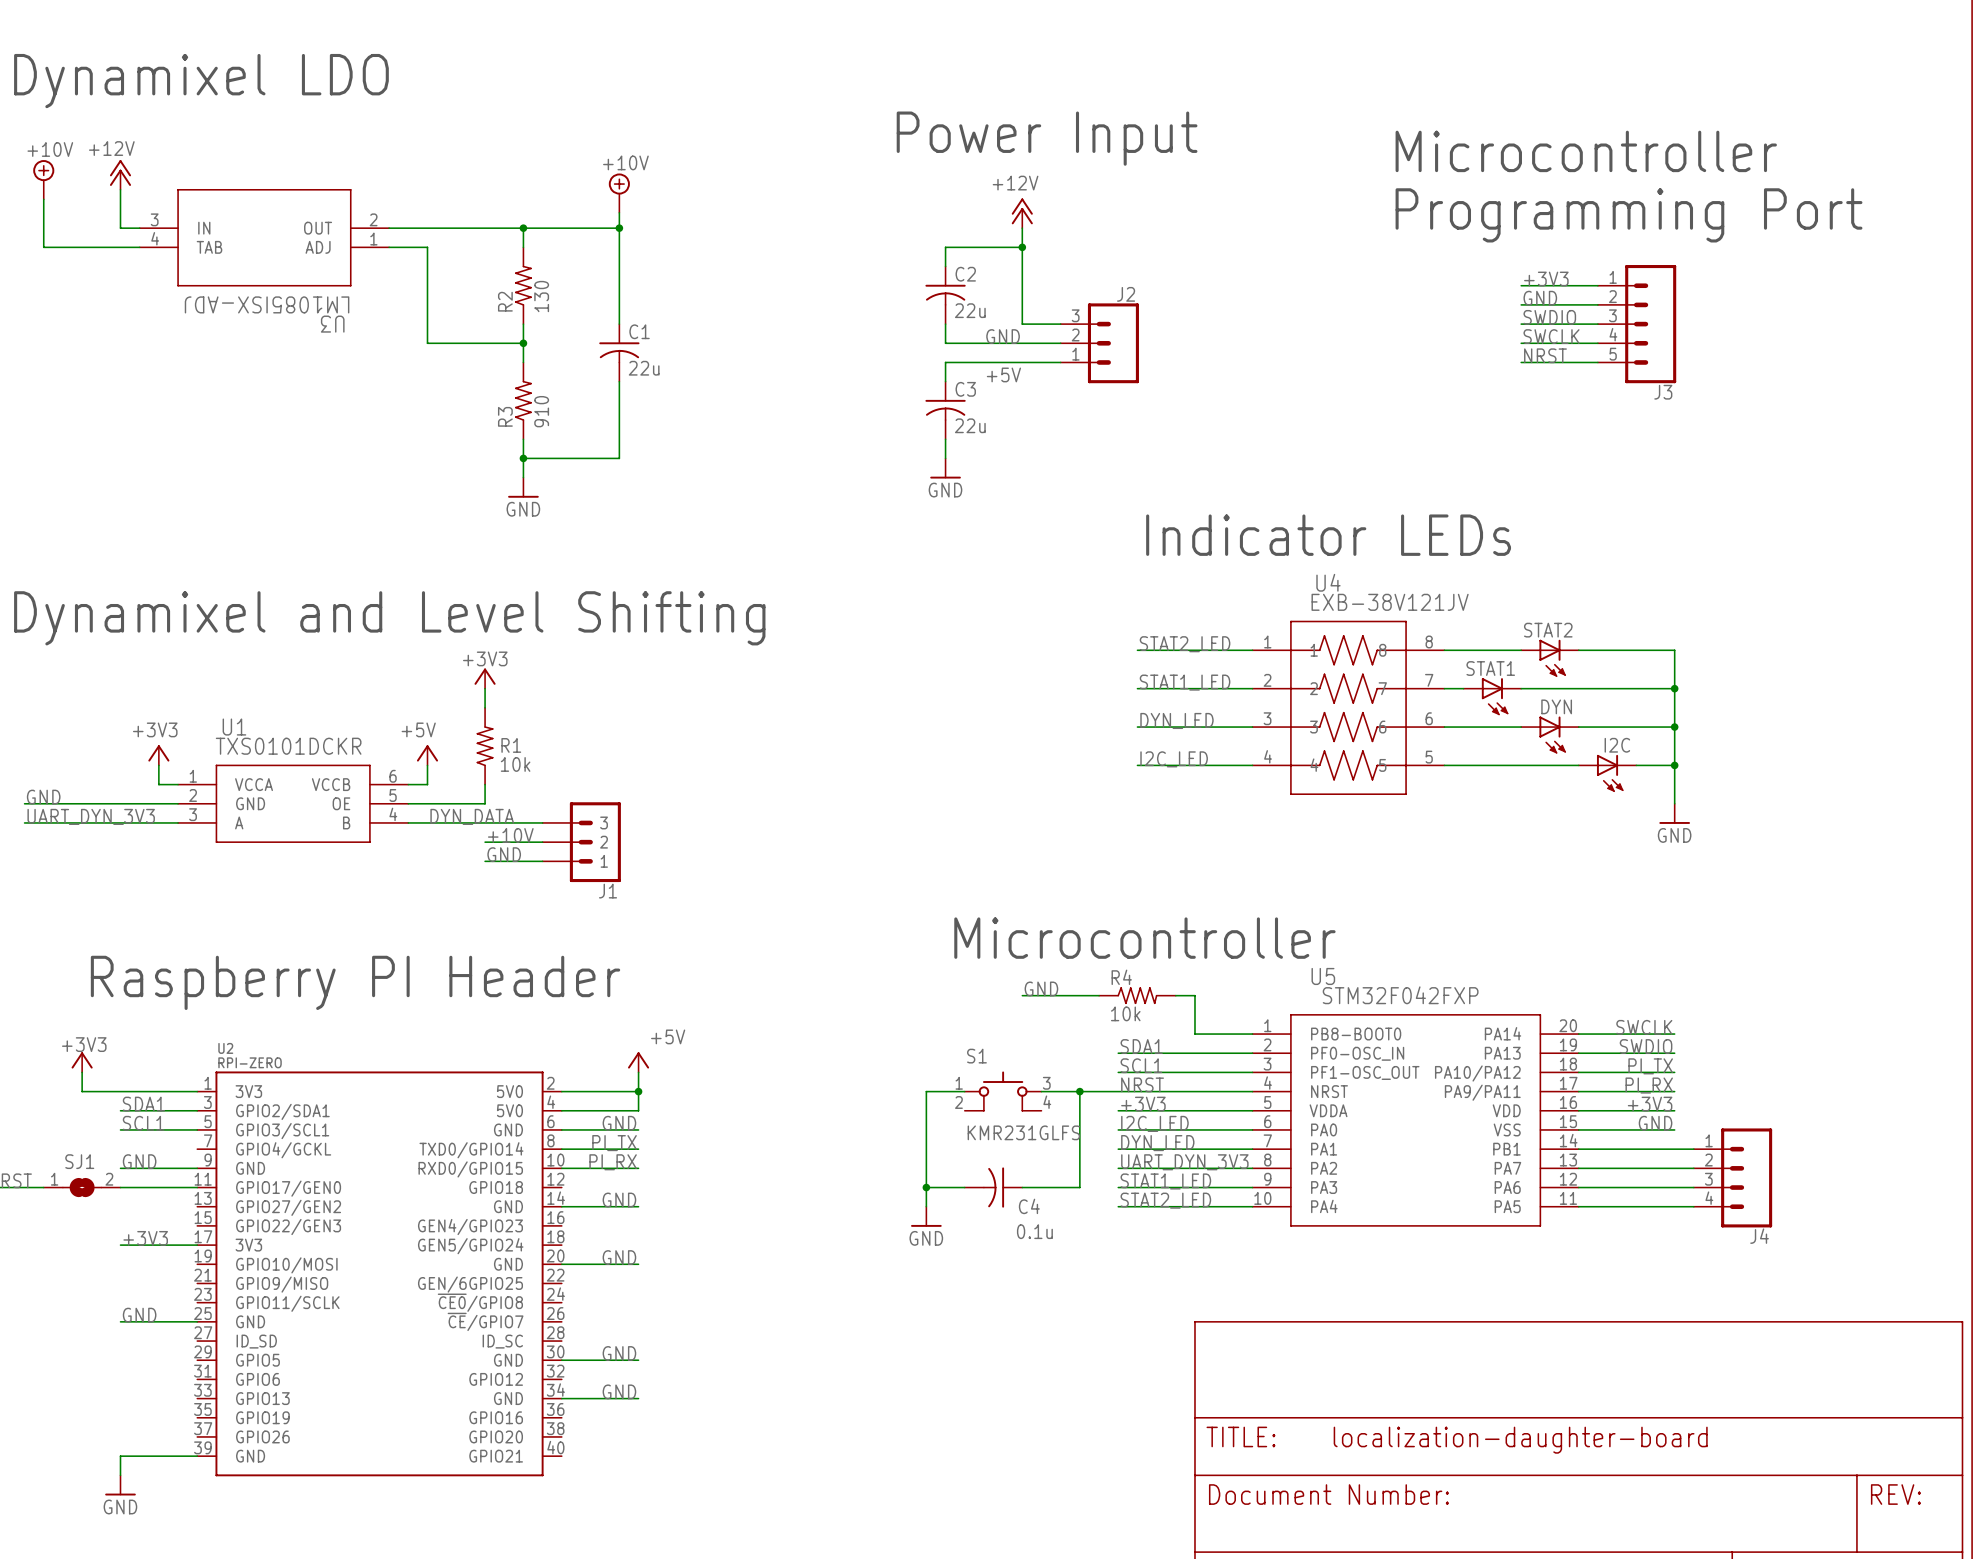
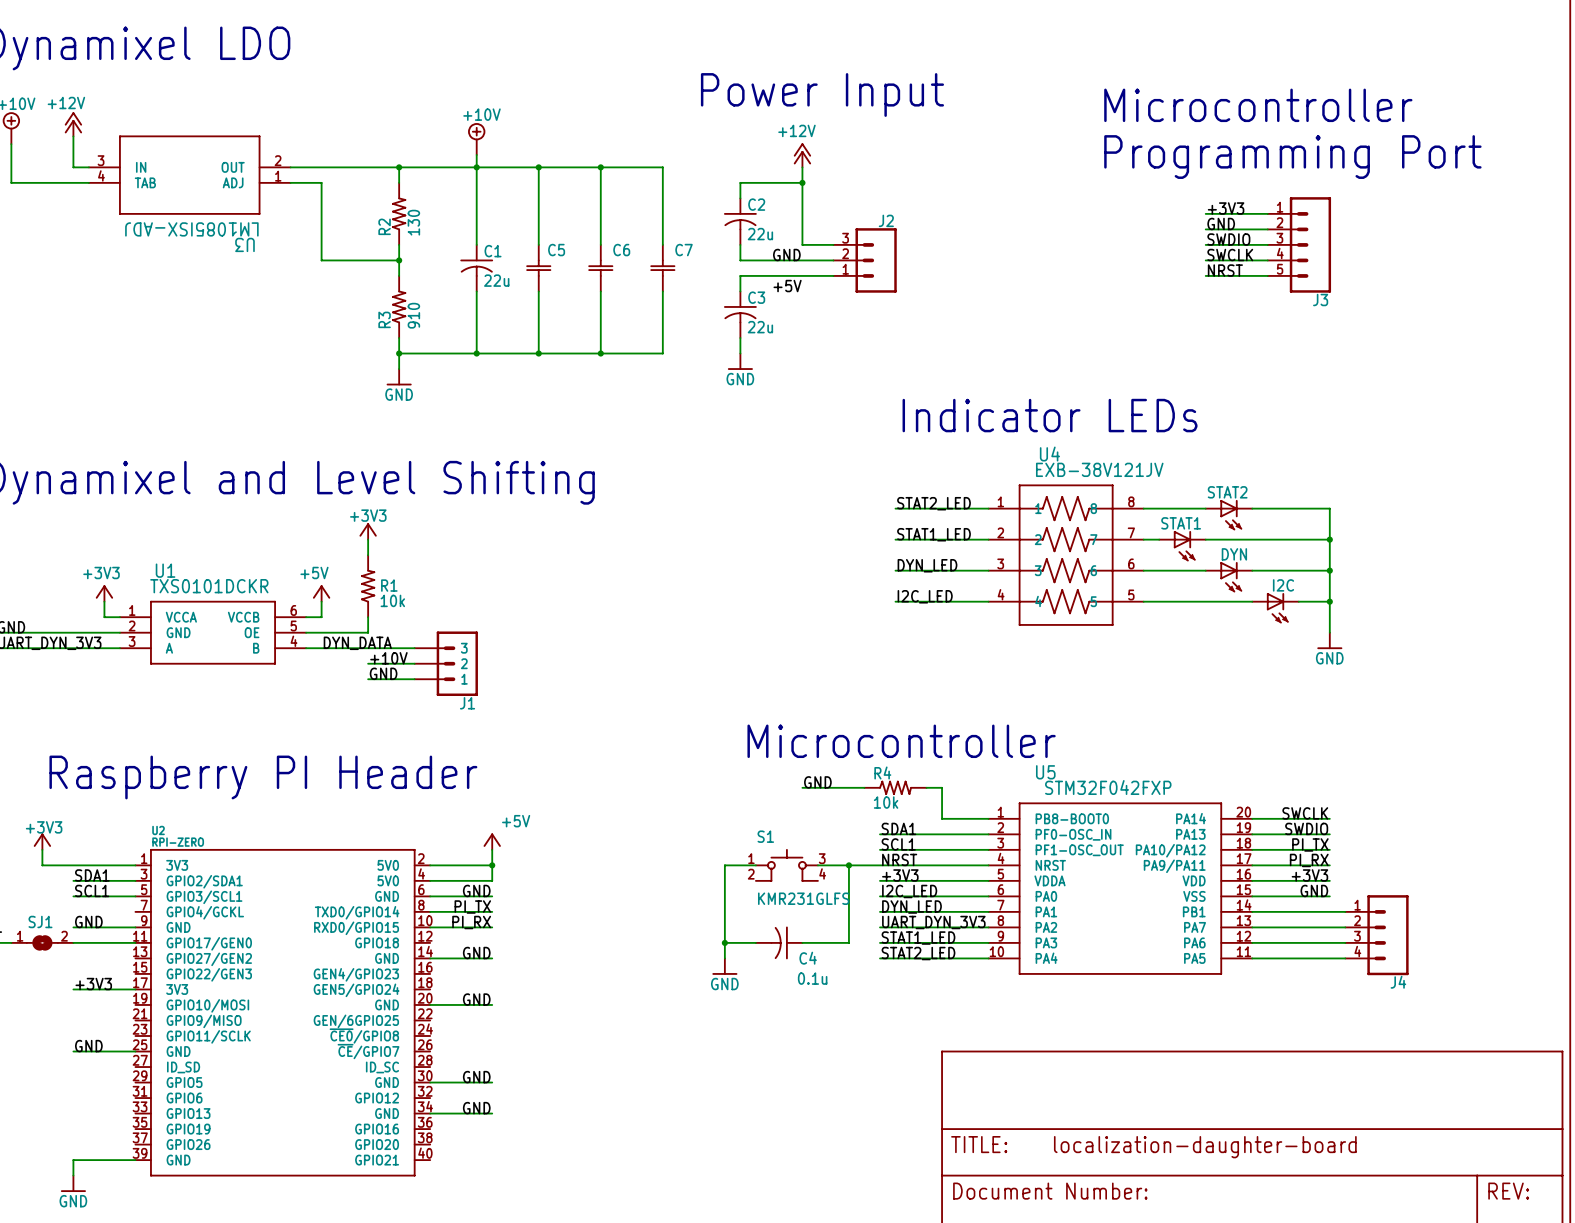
wire: none -> (476, 167) (662, 167) (662, 244)
wire: none -> (538, 167) (538, 244)
junction: none -> (538, 167)
wire: none -> (600, 167) (600, 244)
junction: none -> (600, 167)
C5: none -> (538, 268)
C6: none -> (600, 268)
C7: none -> (662, 268)
wire: none -> (538, 291) (538, 353)
wire: none -> (600, 291) (600, 353)
wire: none -> (662, 291) (662, 353) (476, 353)
junction: none -> (476, 353)
junction: none -> (538, 353)
junction: none -> (600, 353)

